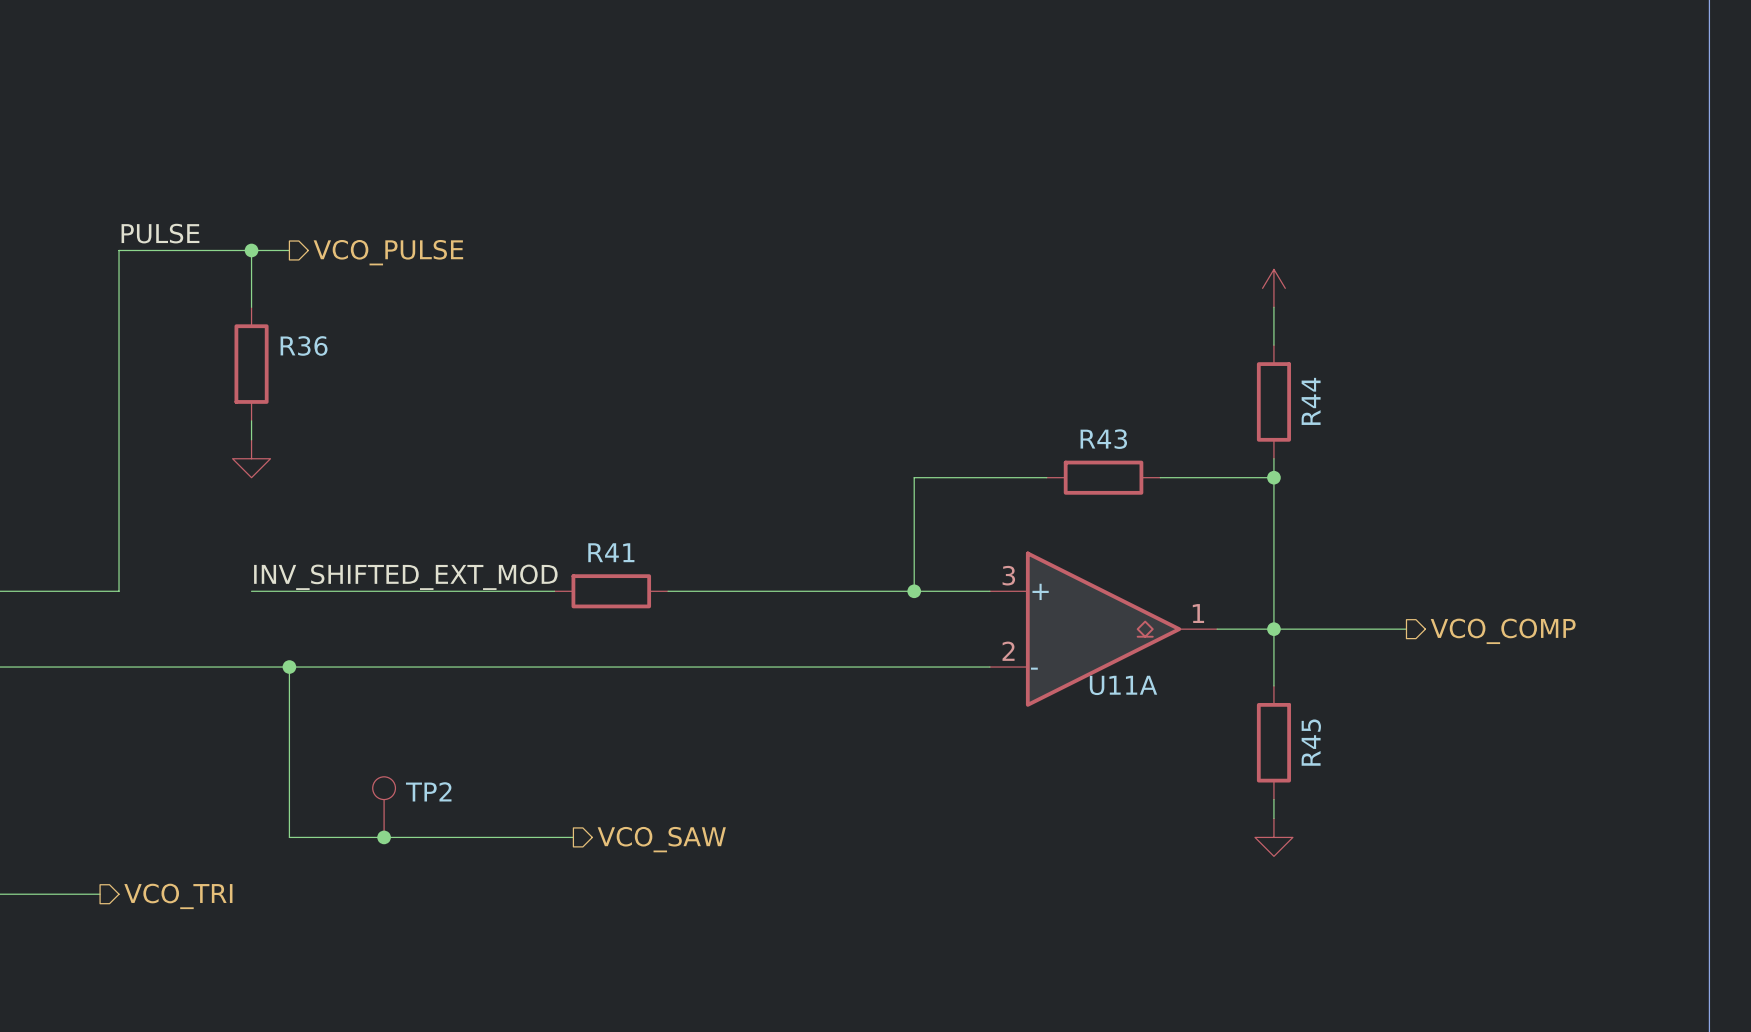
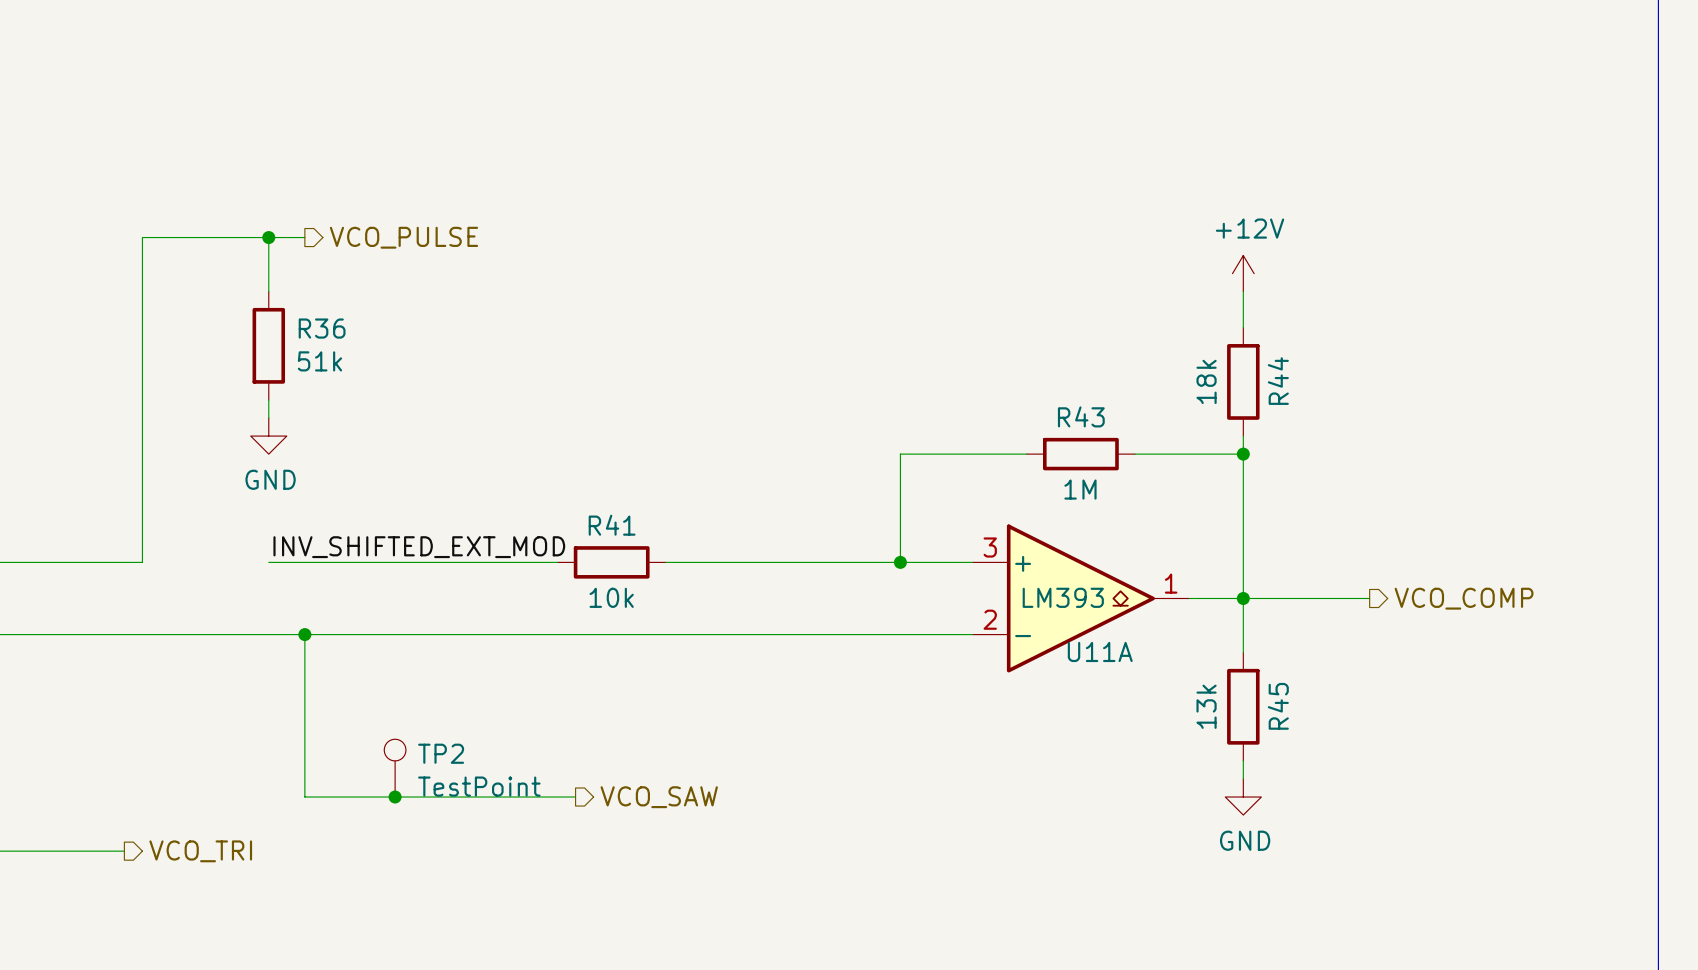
label: PULSE (160, 233) -> none
power symbol text: none -> +12V (1250, 228)
R36 value: none -> 51k (319, 361)
R44 value: none -> 18k (1206, 381)
power symbol text: none -> GND (270, 479)
R43 value: none -> 1M (1080, 489)
R41 value: none -> 10k (611, 597)
U11A value: none -> LM393 (1063, 597)
R45 value: none -> 13k (1206, 706)
TP2 value: none -> TestPoint (479, 786)
power symbol text: none -> GND (1245, 840)

